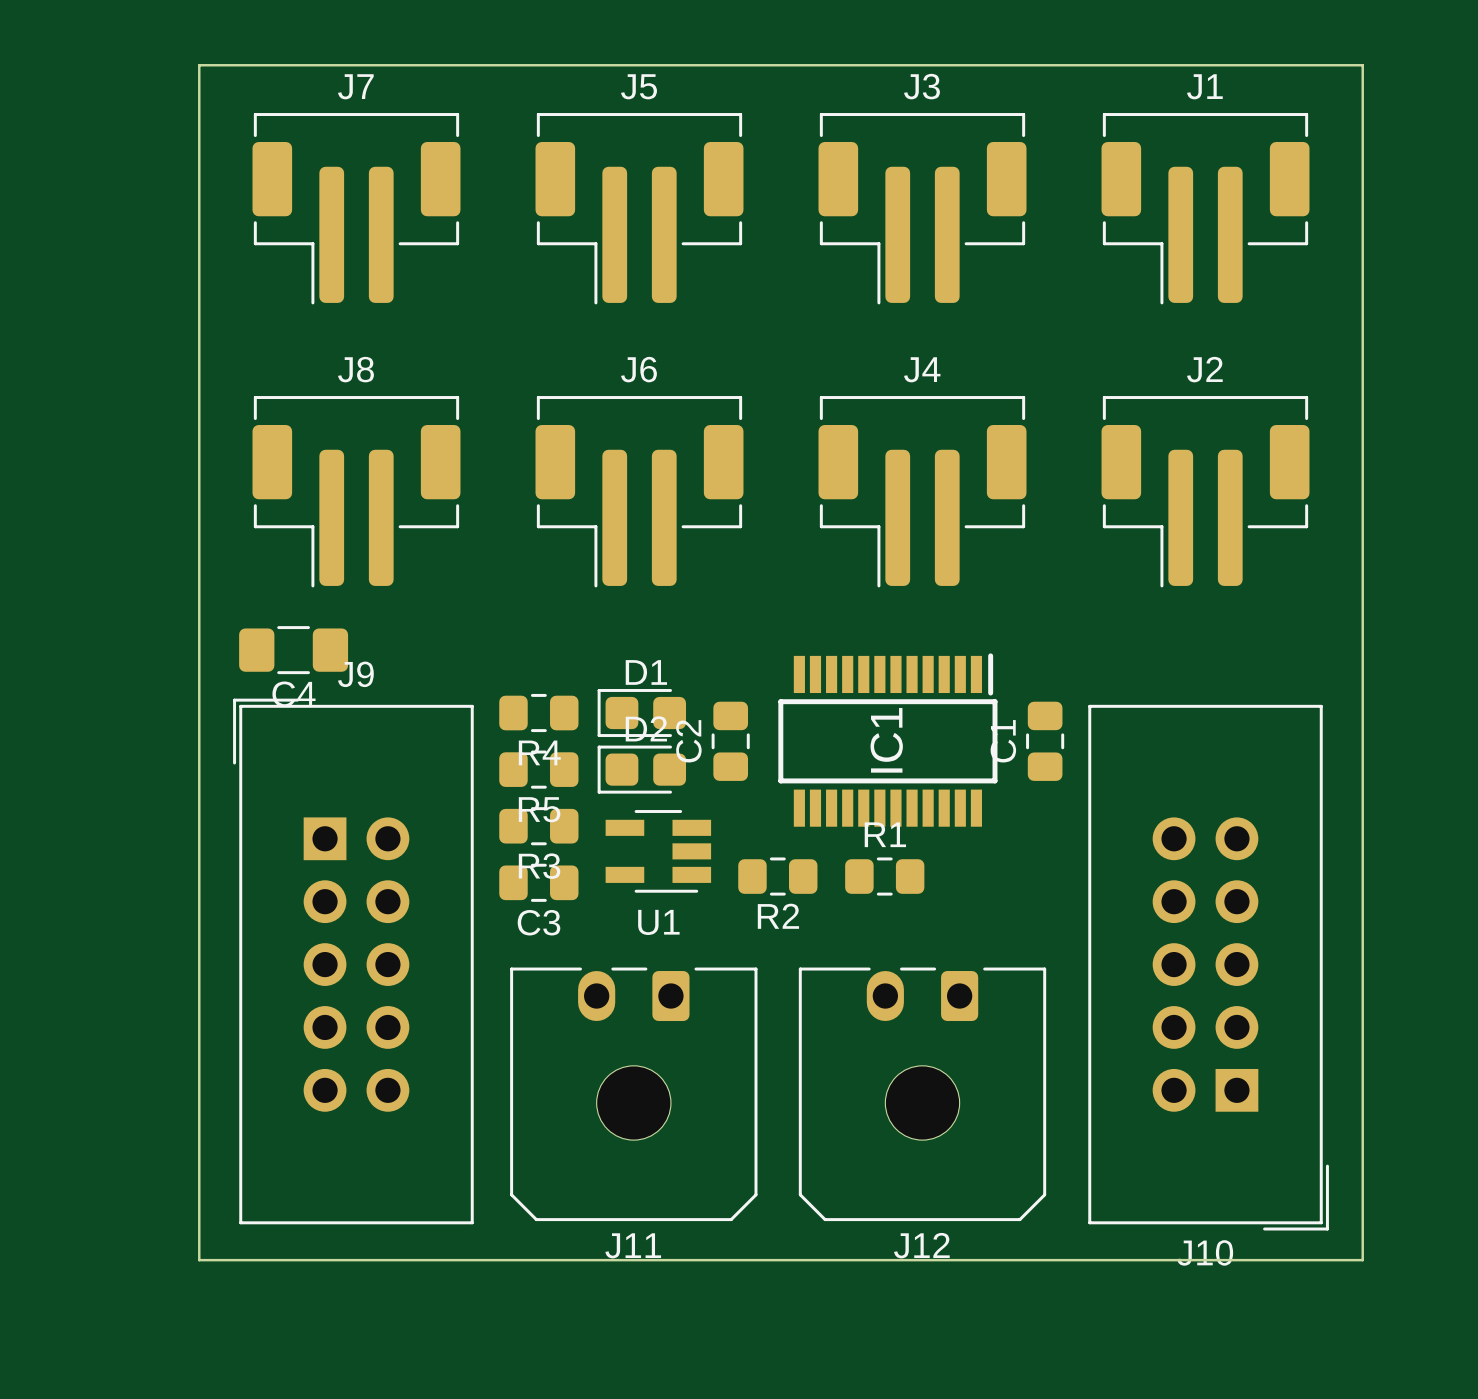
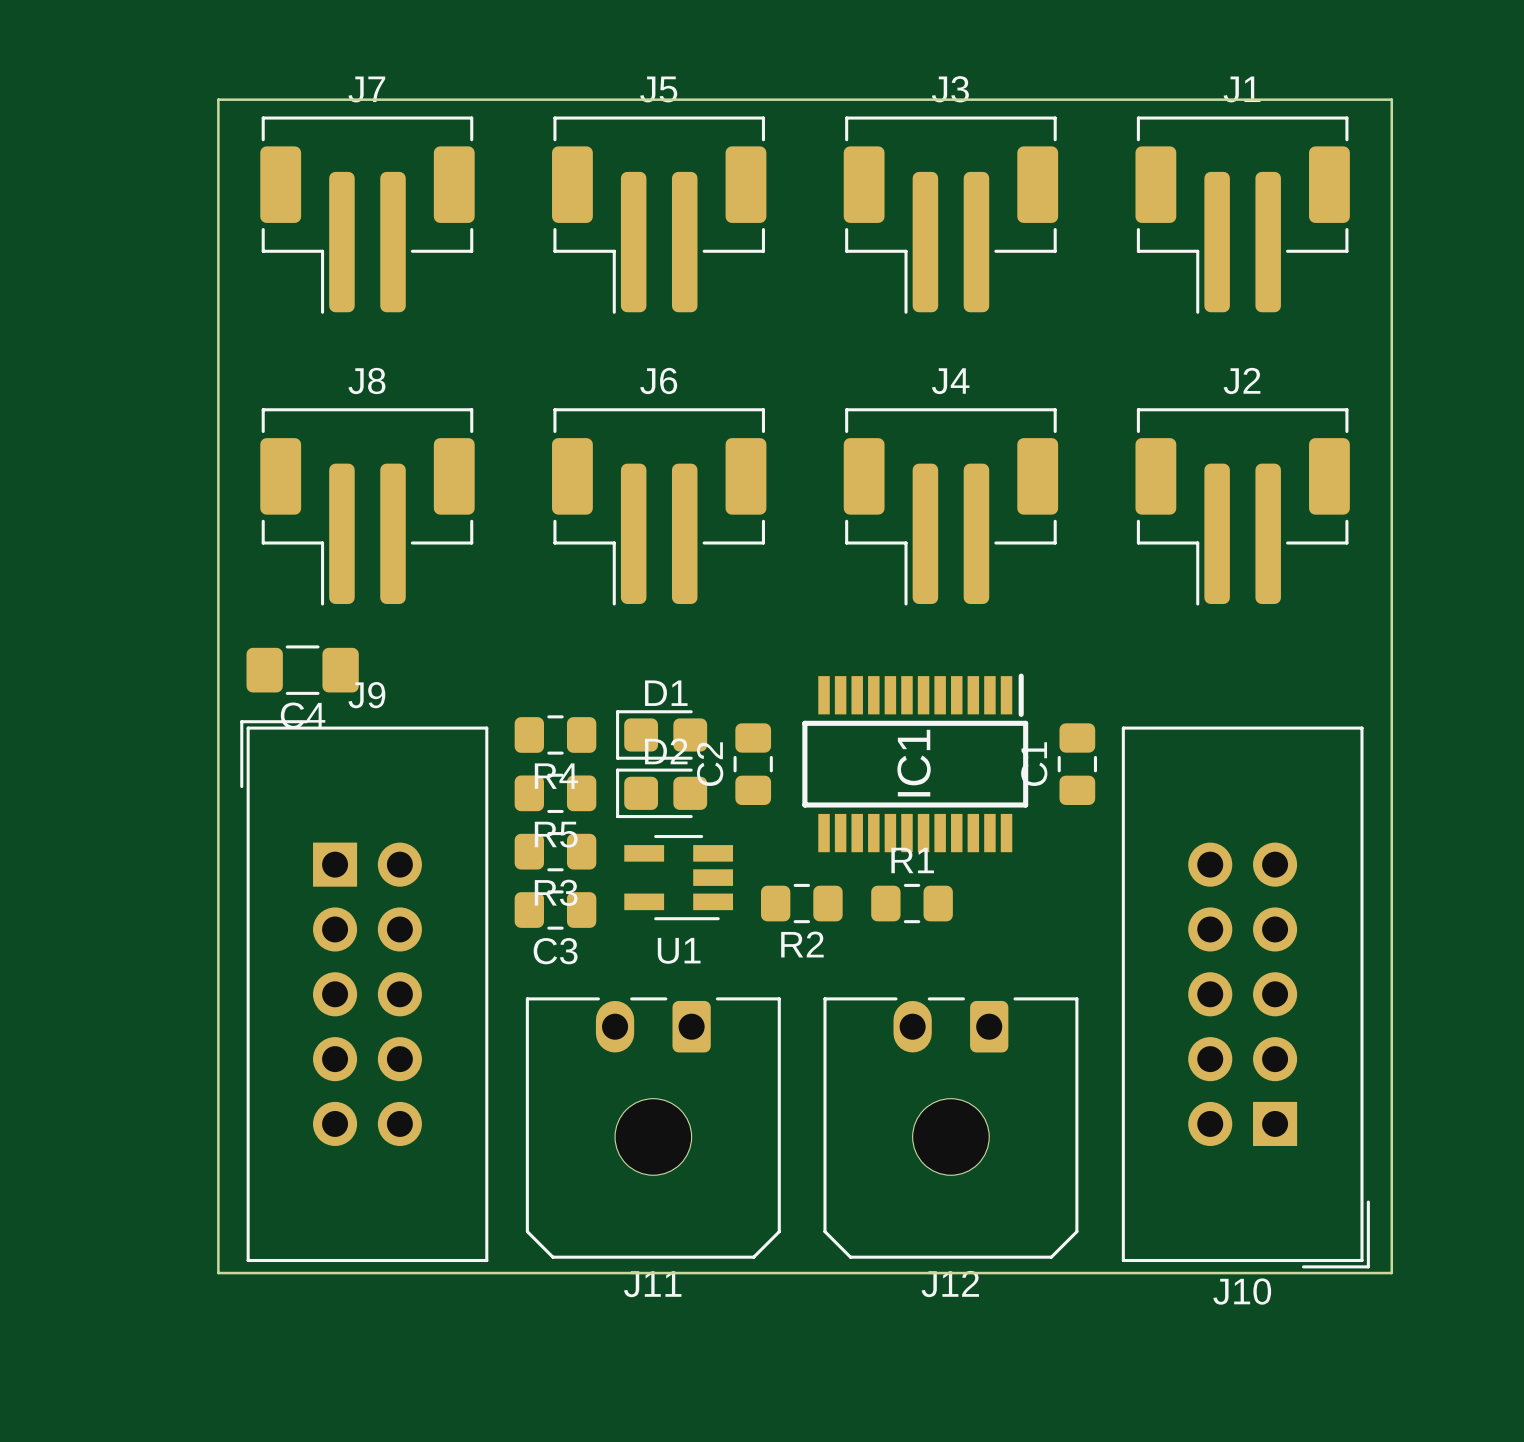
board edge: (199, 65) (1362, 65) (1362, 1260) (199, 1260) (199, 65) -> (218, 99) (218, 1273) (1391, 1273) (1391, 99) (218, 99)

